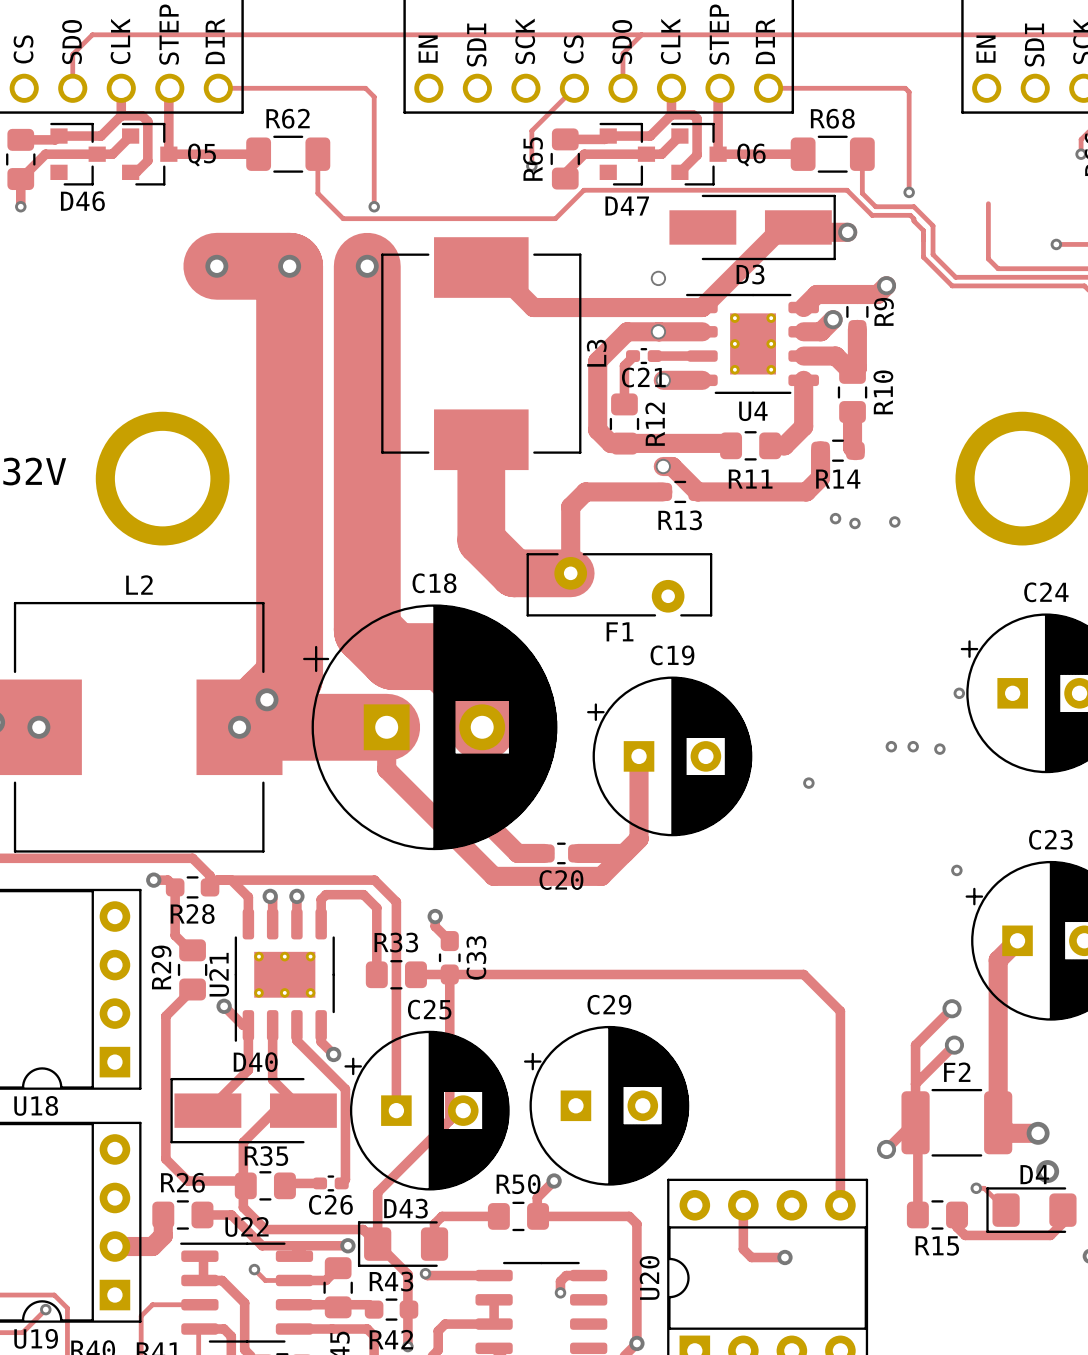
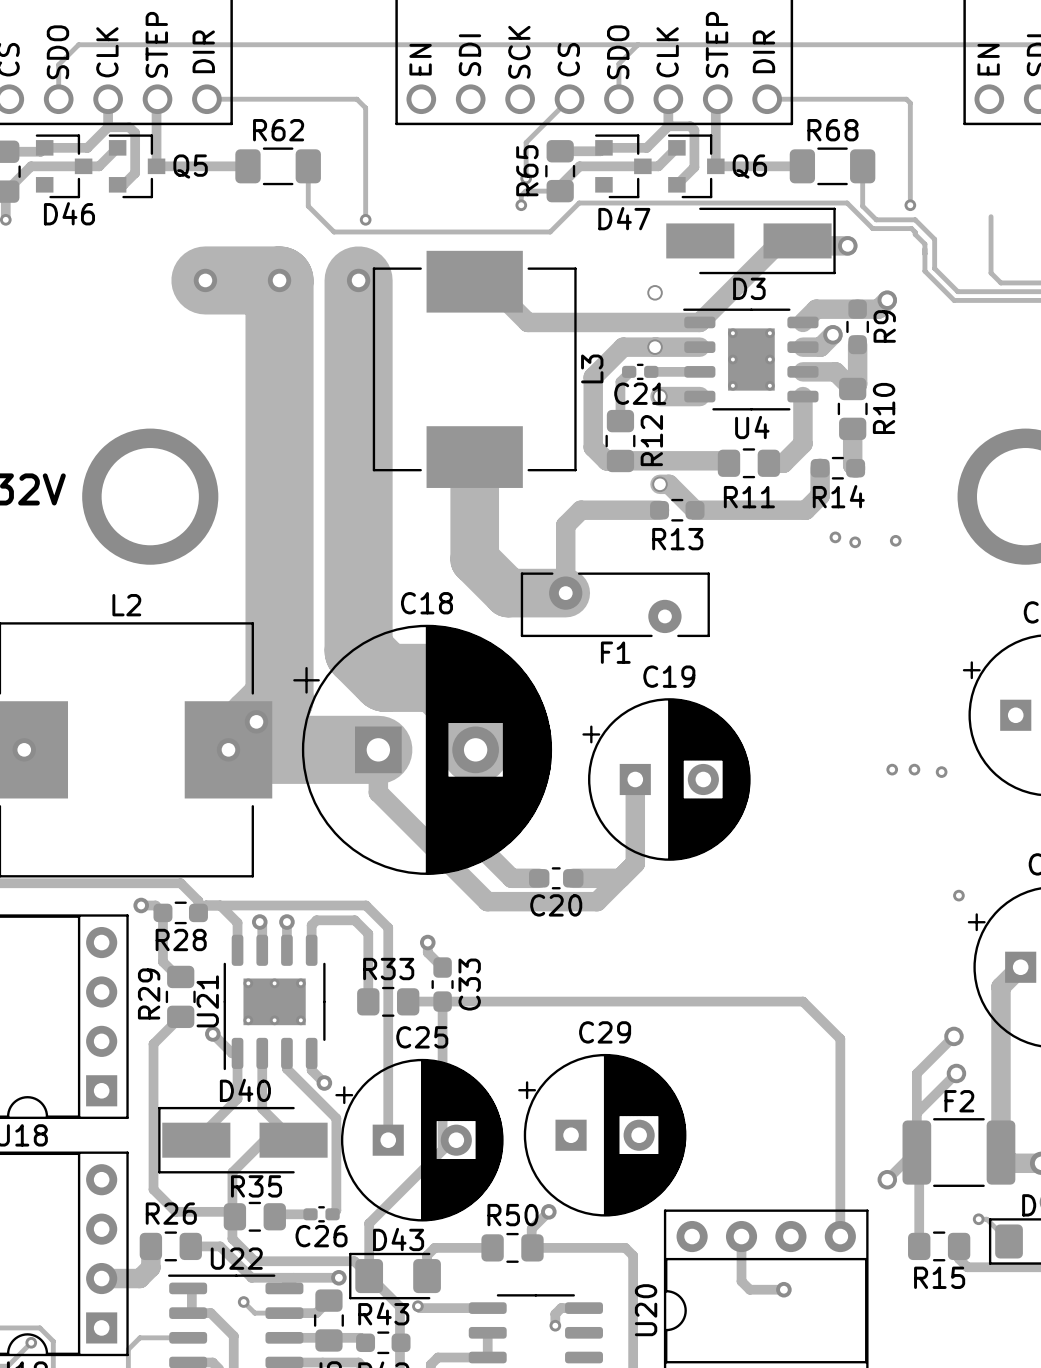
track: none -> (560, 191) (525, 191) (521, 195) (521, 205)
via: none -> (521, 205)
via: (959, 693) -> none
via: (808, 783) -> none

